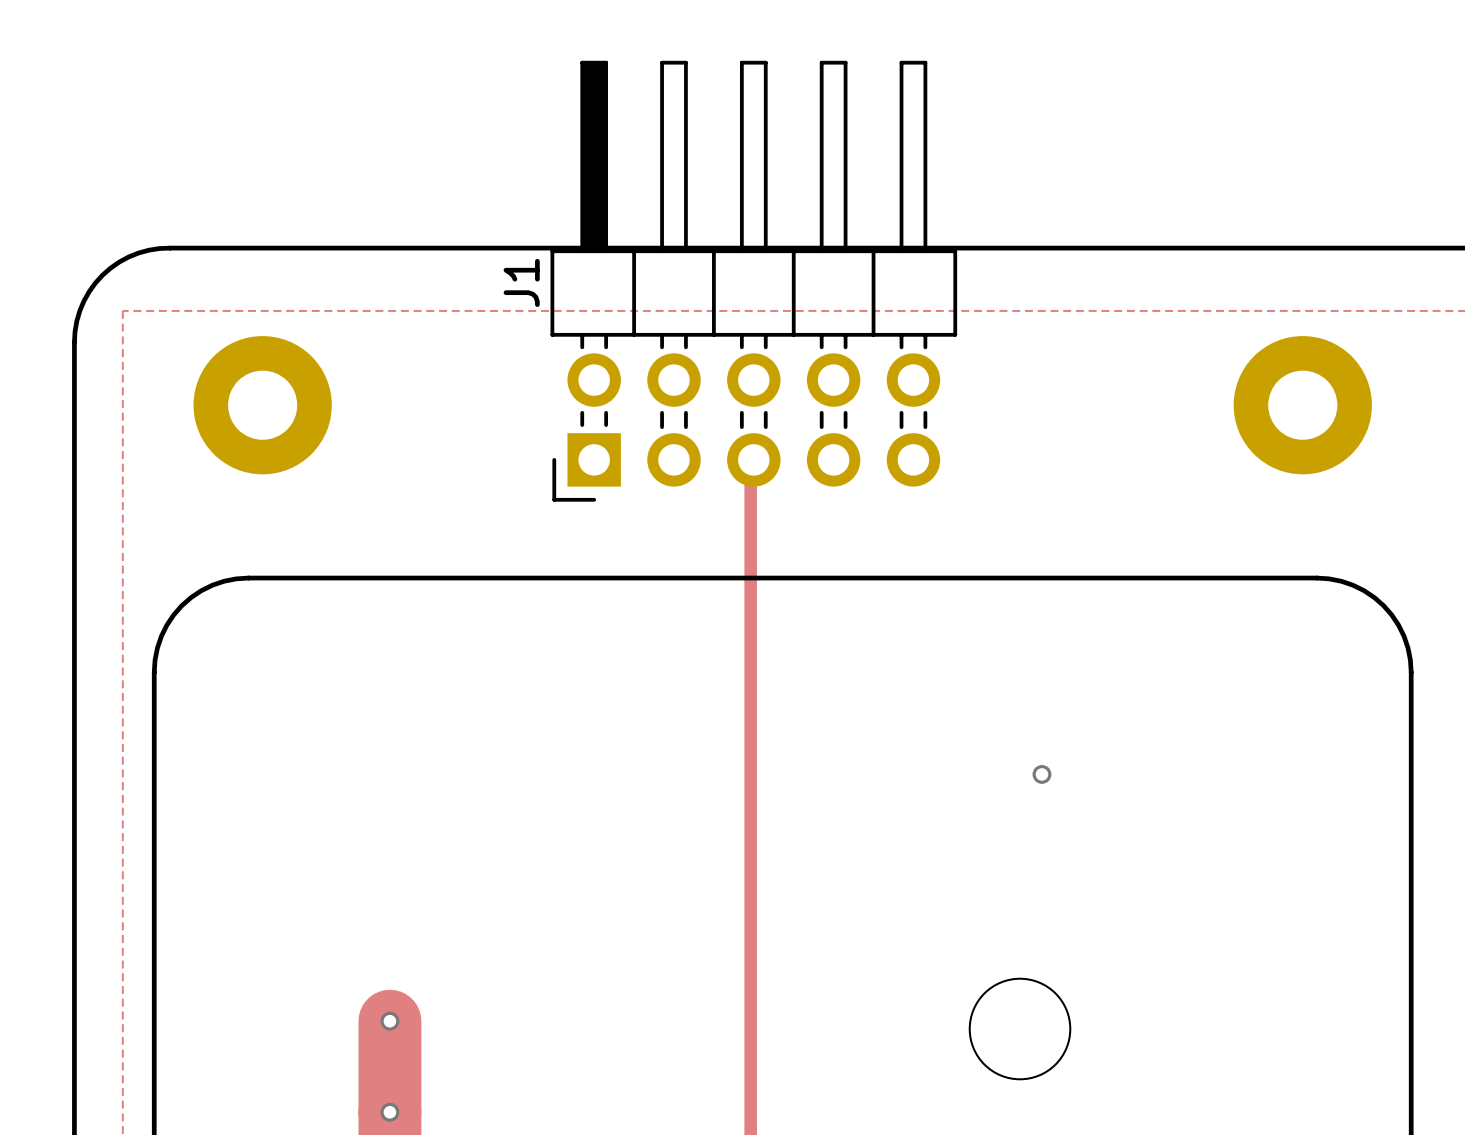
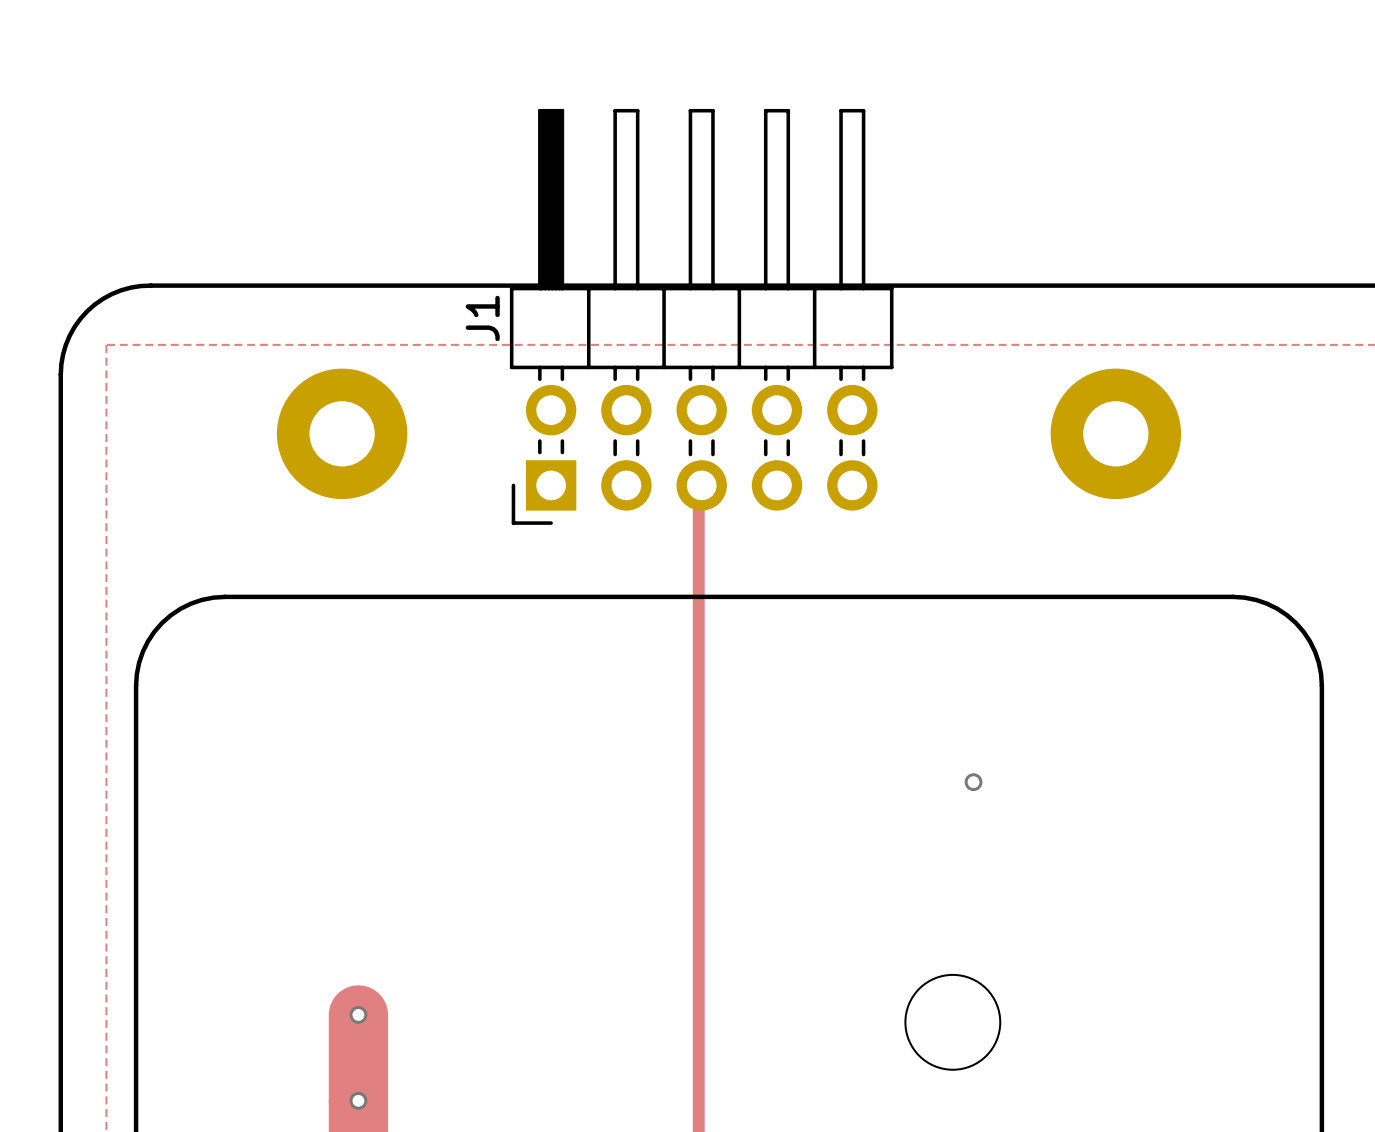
part position: (262, 405) -> (342, 433)
part position: (1302, 405) -> (1115, 433)

